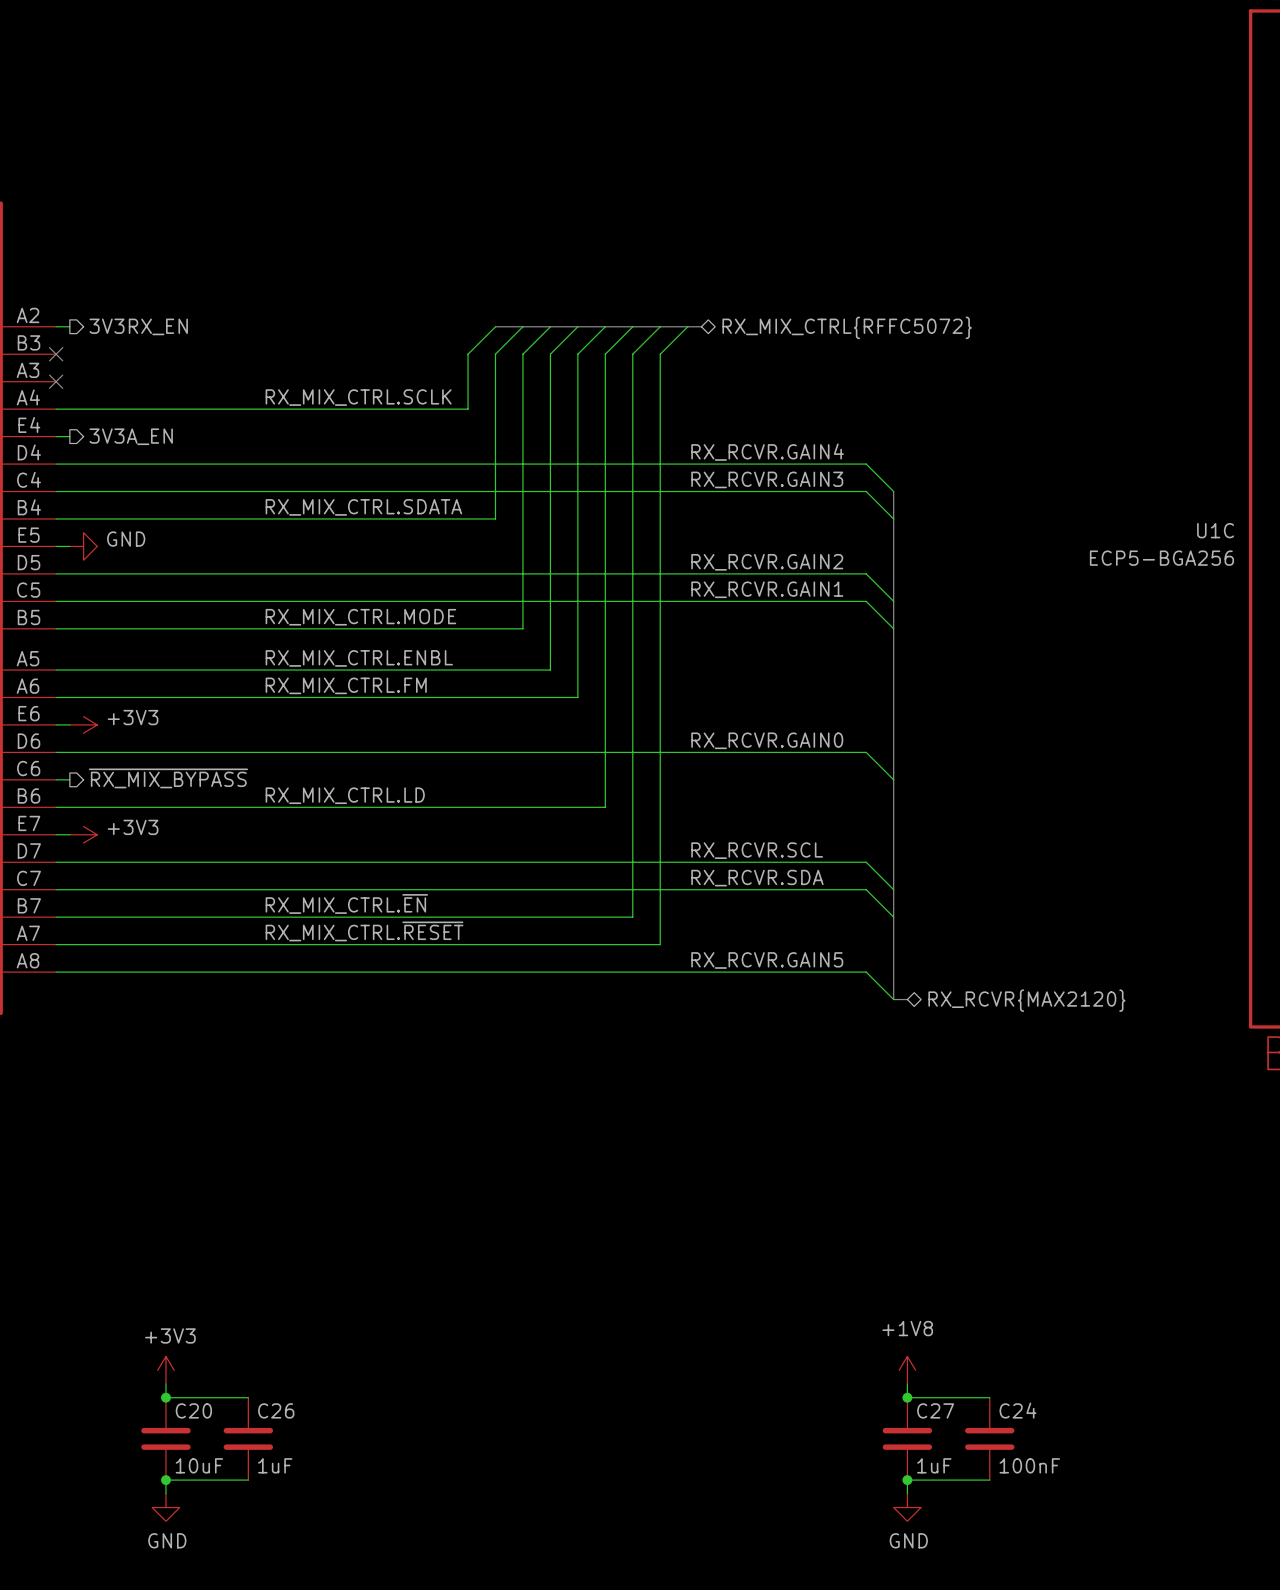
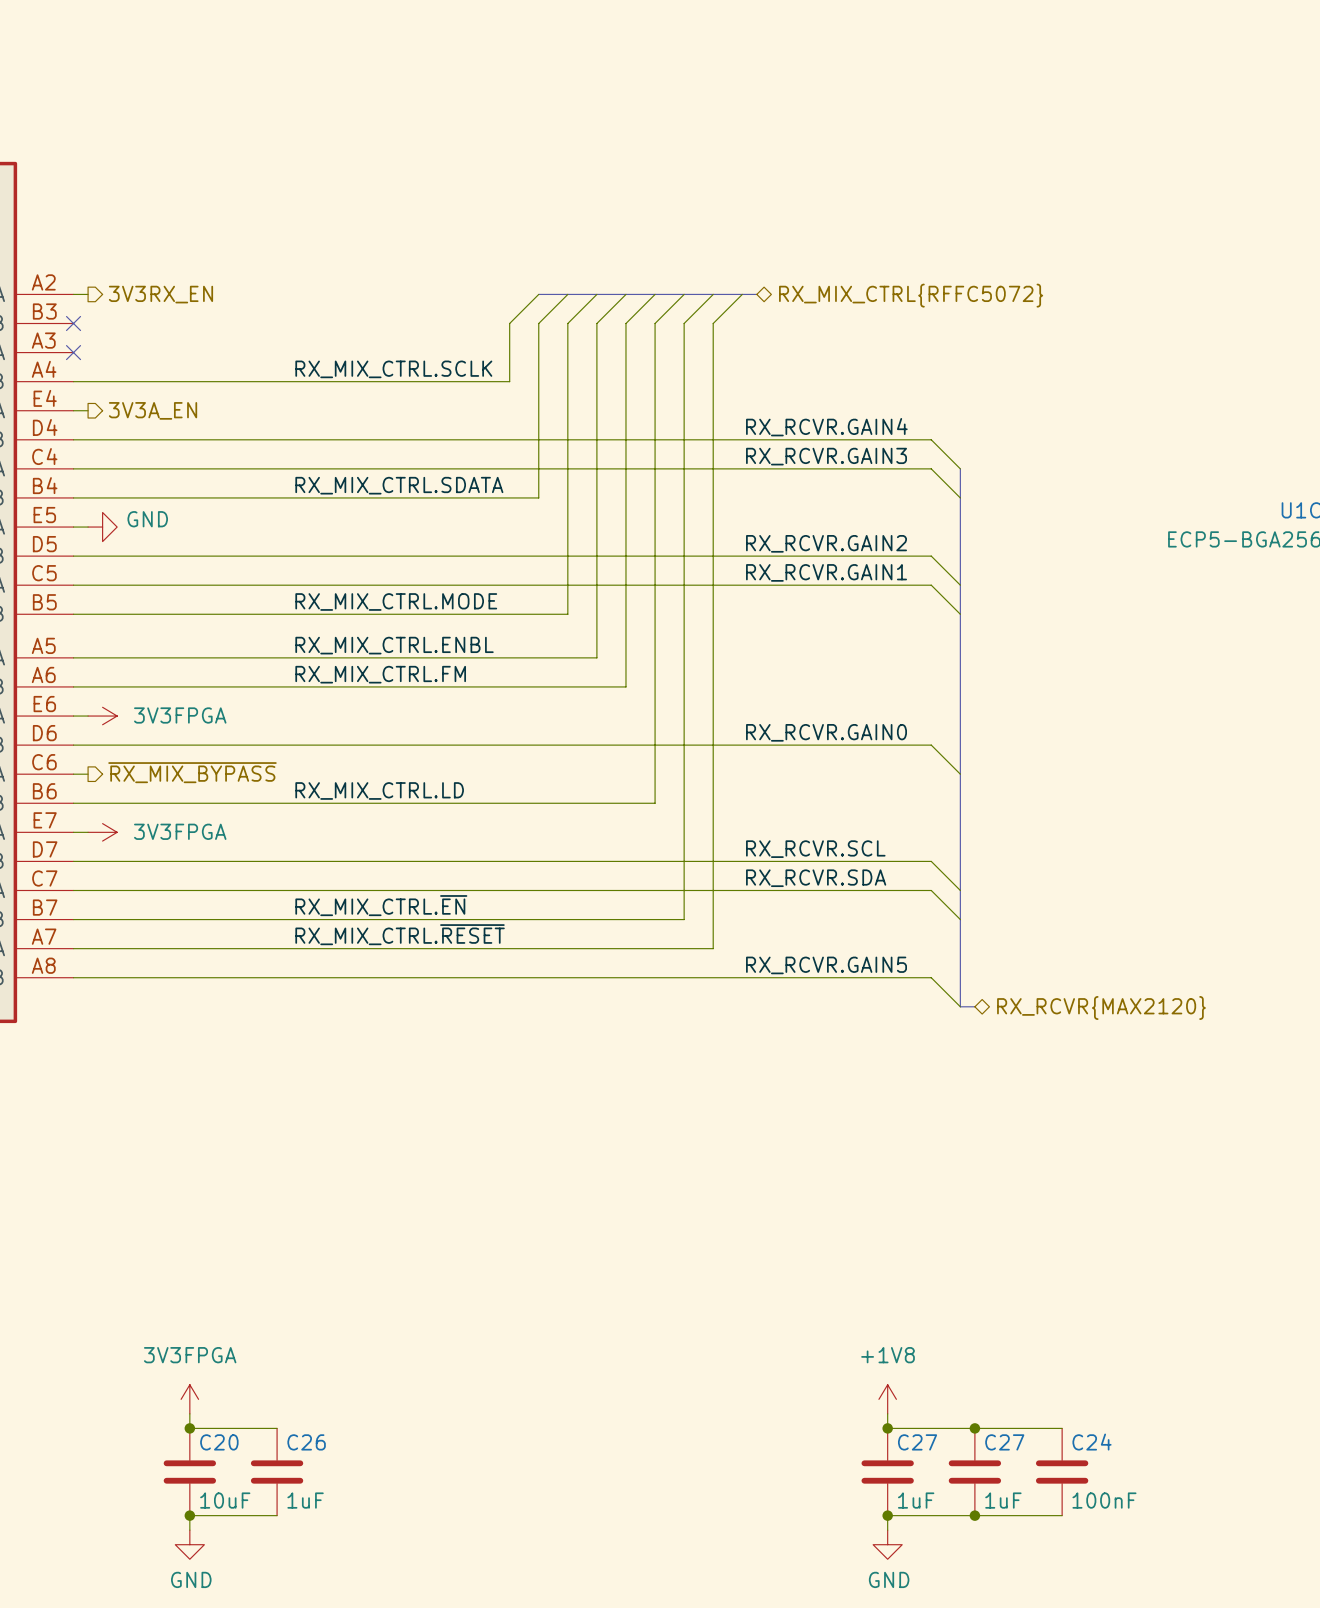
power symbol: +3V3 (83, 724) -> 3V3FPGA (102, 716)
power symbol: +3V3 (83, 834) -> 3V3FPGA (102, 832)
power symbol: +3V3 (165, 1370) -> 3V3FPGA (189, 1399)
power symbol position: +1V8 (907, 1370) -> +1V8 (887, 1399)
wire: (907, 1383) (907, 1397) -> (887, 1413) (887, 1428) (974, 1428)
junction: none -> (887, 1428)
C27: none -> 1uF (887, 1472)
junction: none -> (887, 1515)
wire: (907, 1480) (907, 1493) -> (974, 1515) (887, 1515) (887, 1530)
power symbol position: GND (907, 1507) -> GND (887, 1544)

